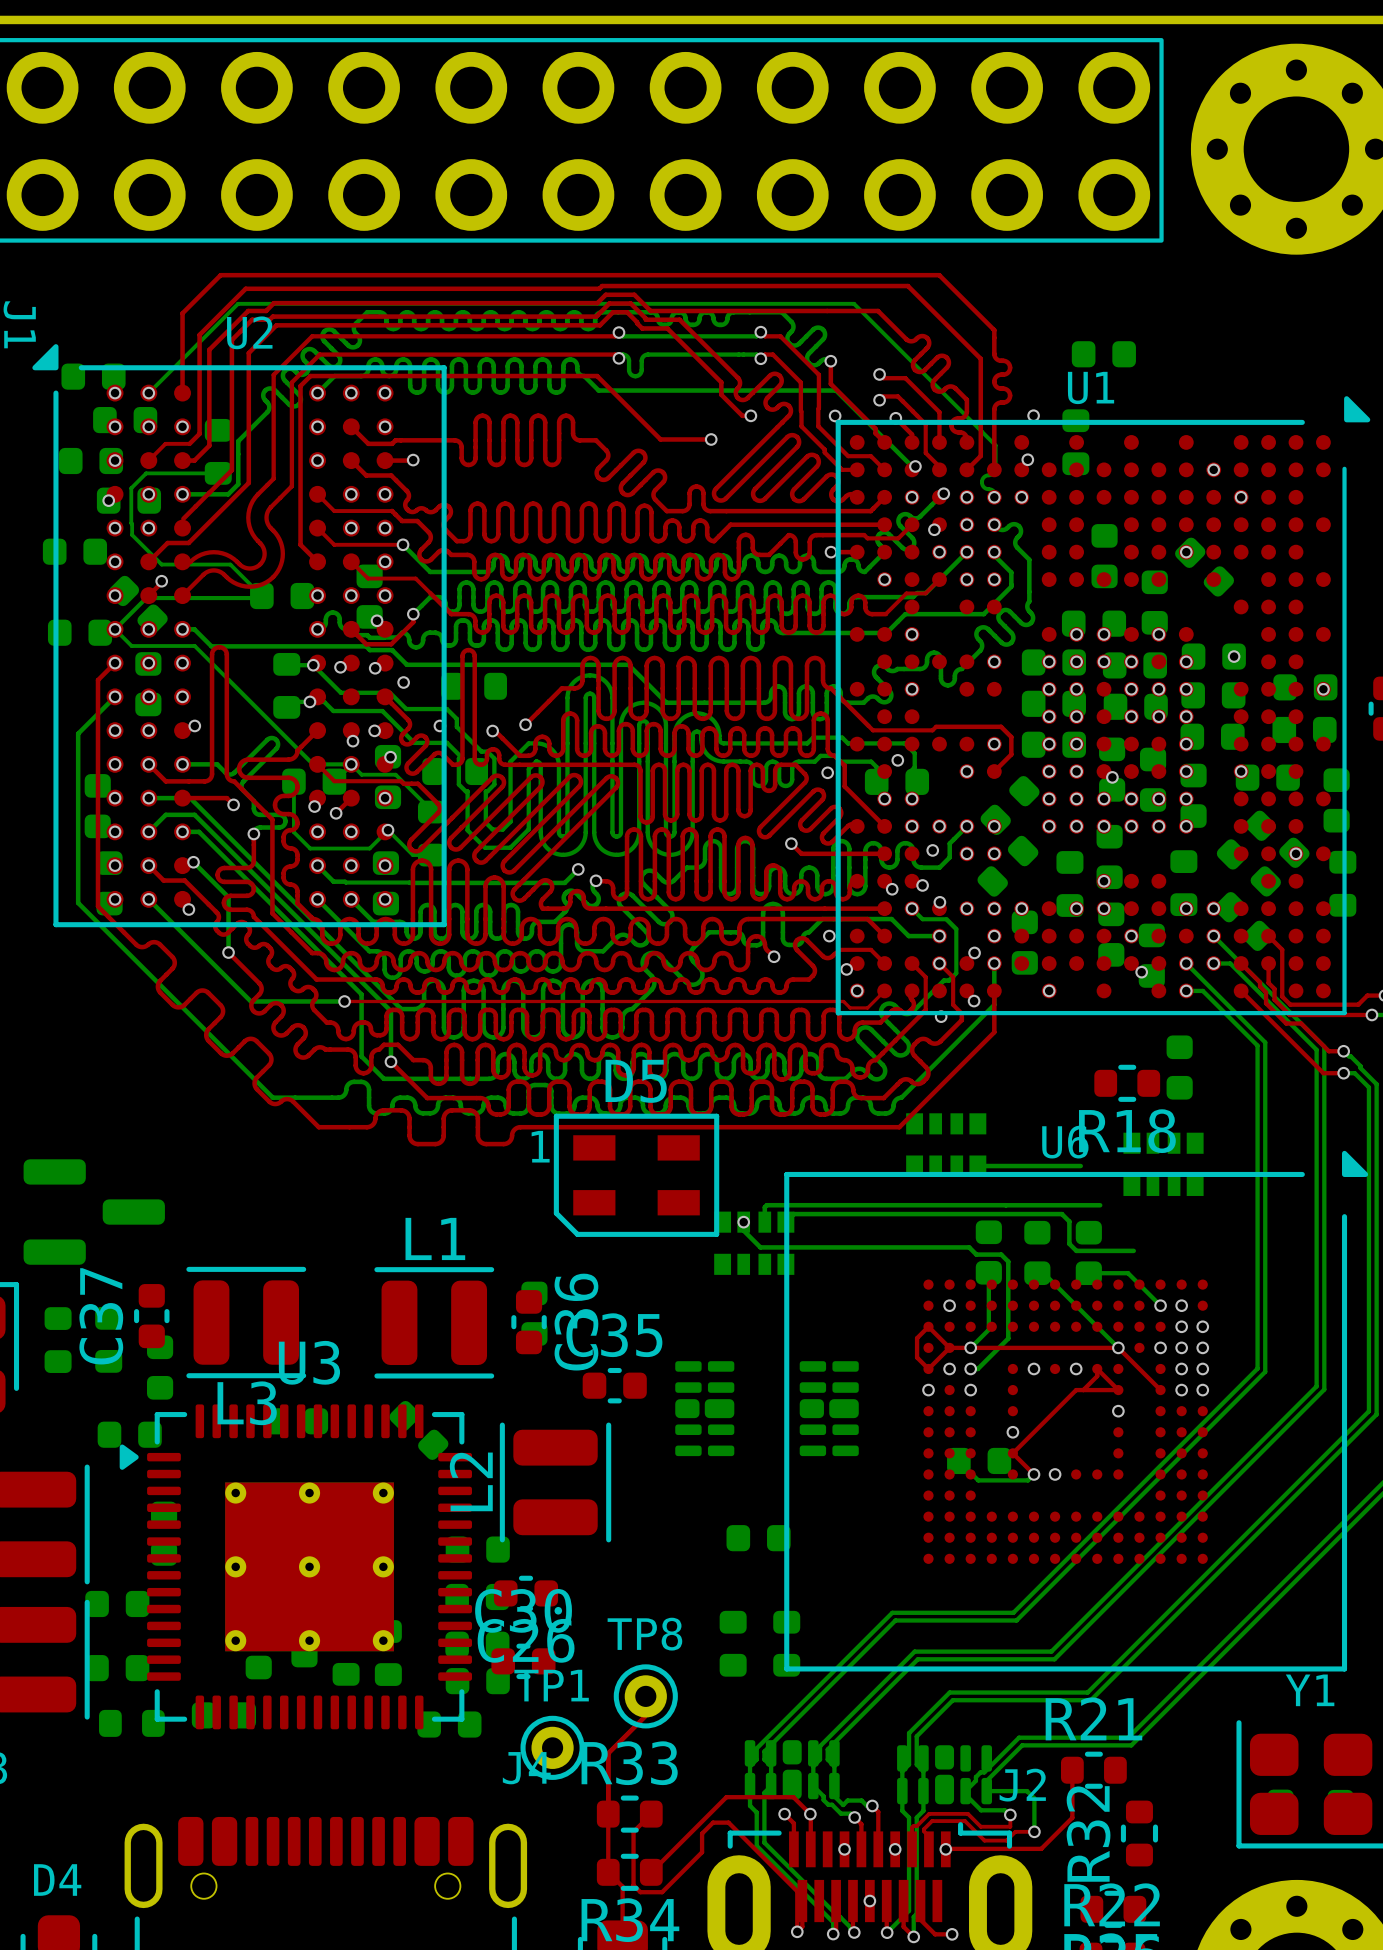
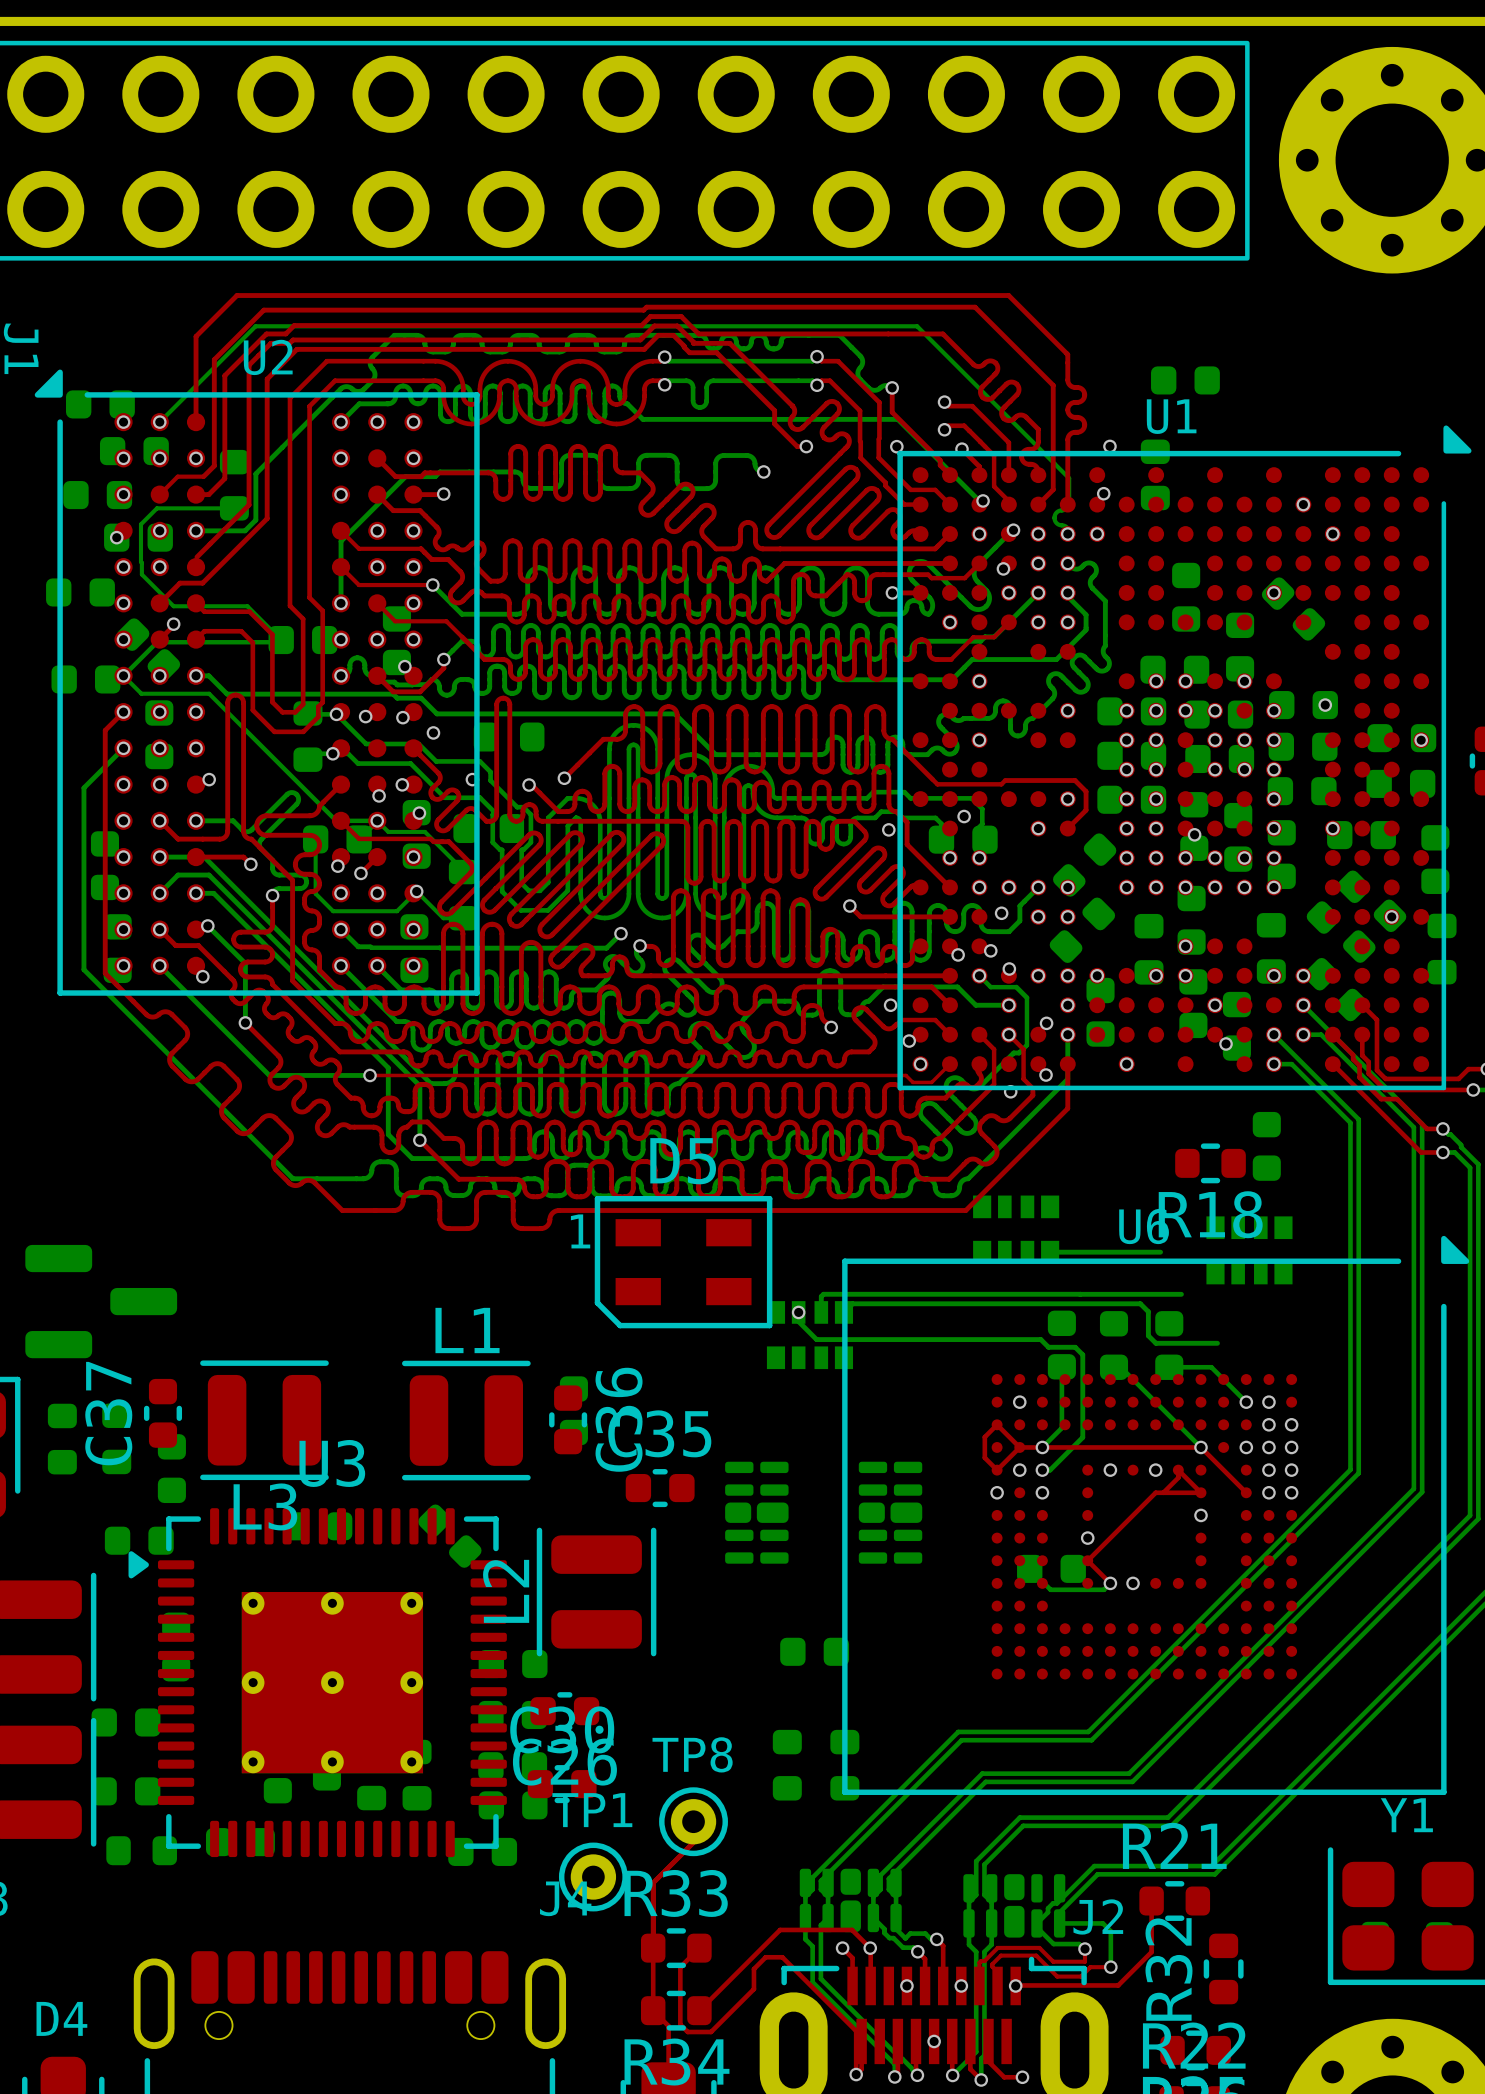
bottom track: (379, 312) (385, 315) (387, 326) (393, 329) (398, 326) (400, 316) (406, 312) (412, 314) (415, 325) (421, 329) (426, 326) (428, 316) (434, 312) (440, 314) (443, 325) (448, 329) (454, 326) (456, 316) (461, 312) (467, 314) (470, 325) (476, 329) (482, 325) (484, 316) (488, 312) (495, 314) (498, 325) (504, 329) (510, 325) (513, 314) (520, 312) (524, 316) (527, 326) (532, 329) (538, 325) (540, 314) (547, 312) (552, 316) (554, 326) (560, 329) (566, 325) (568, 314) (575, 312) (580, 316) (582, 326) (588, 329) (594, 325) (596, 314) (602, 312) -> (407, 335) (421, 336) (426, 348) (433, 351) (449, 350) (455, 338) (460, 335) (478, 336) (483, 348) (490, 351) (506, 350) (512, 338) (517, 335) (535, 336) (540, 348) (547, 351) (563, 350) (568, 339) (573, 335) (588, 335) (594, 338) (600, 350) (616, 351) (622, 348) (625, 340) (629, 336) (646, 335)
bottom track: (791, 321) (793, 328) (787, 337) (789, 343) (797, 344) (814, 328) (821, 328) (824, 332) (824, 337) (808, 353) (807, 360) (814, 365) (824, 359) (830, 361) -> (849, 345) (862, 359) (862, 364) (857, 372) (860, 379) (872, 390) (885, 385) (892, 387)
bottom track: (355, 323) (354, 330) (359, 340) (354, 347) (348, 345) (332, 330) (326, 329) (322, 333) (323, 340) (339, 357) (340, 361) (337, 365) (329, 366) (313, 350) (308, 349) (302, 355) (308, 366) (306, 372) (300, 374) (290, 368) (284, 371) (283, 379) (300, 397) (298, 404) (290, 405) (273, 389) (265, 390) (263, 397) (269, 406) (267, 412) -> (382, 347) (370, 359) (370, 364) (374, 376) (364, 389) (358, 391) (348, 386) (342, 387) (287, 442)
top track: (312, 336) (273, 374) (273, 478) (252, 501) (248, 517) (252, 534) (263, 548) (262, 561) (254, 567) (246, 568) (226, 554) (213, 552) (201, 554) (190, 561) (182, 561) -> (335, 361) (326, 361) (290, 398) (290, 605) (303, 618) (303, 704) (295, 712) (282, 712) (272, 702) (272, 634) (249, 611) (204, 611) (196, 603)
top track: (405, 336) (607, 336) -> (435, 361) (446, 363) (457, 372) (462, 381) (464, 399) (471, 404) (479, 399) (482, 378) (490, 366) (504, 361) (518, 363) (532, 375) (535, 385) (536, 398) (539, 403) (544, 404) (548, 403) (552, 398) (552, 385) (556, 375) (569, 363) (584, 361) (597, 366) (606, 378) (609, 399) (616, 404) (624, 399) (625, 381) (630, 372) (638, 364) (652, 361)
top track: (319, 354) (291, 382) (291, 486) (269, 508) (266, 516) (267, 524) (277, 536) (282, 546) (282, 561) (277, 571) (266, 582) (249, 586) (233, 582) (218, 571) (210, 570) (204, 573) (190, 587) -> (343, 380) (335, 380) (309, 406) (309, 597) (322, 610) (322, 702) (318, 706) (318, 716) (303, 731) (274, 731) (252, 710) (252, 642) (241, 631) (204, 631)
top track: (405, 354) (607, 354) -> (435, 380) (440, 382) (443, 386) (443, 399) (447, 410) (460, 421) (475, 423) (488, 418) (497, 406) (500, 385) (507, 380) (515, 385) (517, 403) (521, 413) (530, 420) (544, 424) (554, 421) (566, 413) (571, 403) (572, 385) (580, 380) (587, 385) (590, 406) (599, 418) (612, 423) (627, 421) (640, 410) (644, 399) (645, 386) (647, 382) (652, 380)
bottom track: (622, 354) (628, 358) (629, 373) (635, 376) (641, 372) (641, 360) (644, 355) (664, 354) -> (668, 380) (690, 382) (693, 386) (693, 403) (699, 407) (706, 402) (707, 384) (713, 380)
bottom track: none -> (763, 471) (756, 468) (753, 459) (749, 455) (722, 455) (716, 461) (715, 481) (712, 486) (684, 488) (677, 483) (677, 462) (673, 456) (645, 455) (638, 461) (638, 481) (635, 486) (607, 488) (600, 483) (600, 462) (597, 457) (592, 455) (569, 455) (562, 460) (561, 482) (554, 488) (528, 487) (524, 484) (521, 475) (515, 472) (439, 471) (435, 476) (405, 476) (341, 541) (341, 603)
top track: (711, 439) (660, 439) (597, 376) (310, 376) (300, 386) (300, 544) (317, 561) -> none
bottom track: (920, 516) (914, 518) (904, 514) (898, 519) (899, 525) (913, 540) (913, 545) (909, 549) (903, 548) (887, 533) (879, 534) (877, 540) (882, 548) (882, 553) (865, 571) -> (988, 554) (976, 566) (974, 571) (975, 579) (987, 591) (989, 596) (987, 605) (979, 609) (971, 607) (926, 563) (919, 561) (912, 564) (909, 571) (910, 578) (931, 601) (932, 606) (929, 613)
via: none -> (341, 603)
bottom track: (480, 571) (491, 570) (494, 558) (500, 555) (506, 558) (509, 569) (516, 571) (520, 568) (523, 558) (528, 555) (534, 558) (537, 569) (542, 571) (547, 569) (550, 558) (556, 555) (562, 558) (564, 569) (570, 571) (575, 569) (578, 558) (583, 555) (589, 557) (592, 568) (598, 571) (603, 569) (606, 558) (611, 555) (616, 557) (620, 568) (625, 571) (631, 569) (634, 558) (639, 555) (644, 557) (647, 568) (653, 571) (659, 569) (661, 558) (666, 555) (672, 557) (675, 568) (681, 571) (687, 569) (689, 559) (694, 555) (700, 557) (703, 568) (709, 571) (715, 568) (718, 557) (725, 556) (729, 559) (731, 569) (737, 571) (743, 568) (746, 557) (752, 555) (757, 558) (759, 569) (765, 571) (771, 568) (774, 557) (779, 555) (785, 558) (787, 569) (793, 571) (798, 568) (802, 557) (807, 555) (812, 558) (815, 569) (820, 571) -> (516, 614) (522, 612) (527, 606) (528, 574) (533, 569) (539, 567) (545, 569) (549, 574) (550, 605) (553, 610) (560, 614) (567, 612) (571, 607) (573, 575) (578, 569) (584, 567) (590, 569) (594, 574) (595, 605) (598, 610) (604, 613) (611, 613) (617, 607) (618, 575) (623, 569) (629, 567) (635, 569) (640, 575) (641, 605) (648, 613) (656, 613) (661, 608) (664, 575) (667, 570) (674, 567) (680, 569) (685, 575) (688, 608) (695, 613) (703, 612) (708, 604) (709, 575) (714, 569) (720, 567) (727, 570) (730, 575) (732, 607) (738, 613) (745, 613) (750, 610) (753, 605) (755, 574) (759, 569) (765, 567) (771, 569) (776, 575) (778, 607) (783, 613) (790, 613) (796, 610) (799, 605) (800, 574) (804, 569) (810, 567) (816, 569) (821, 575) (823, 607) (827, 612) (834, 614) (841, 610) (844, 605) (845, 574) (850, 569) (856, 567) (863, 570) (866, 575) (868, 607) (873, 613) (881, 614)

